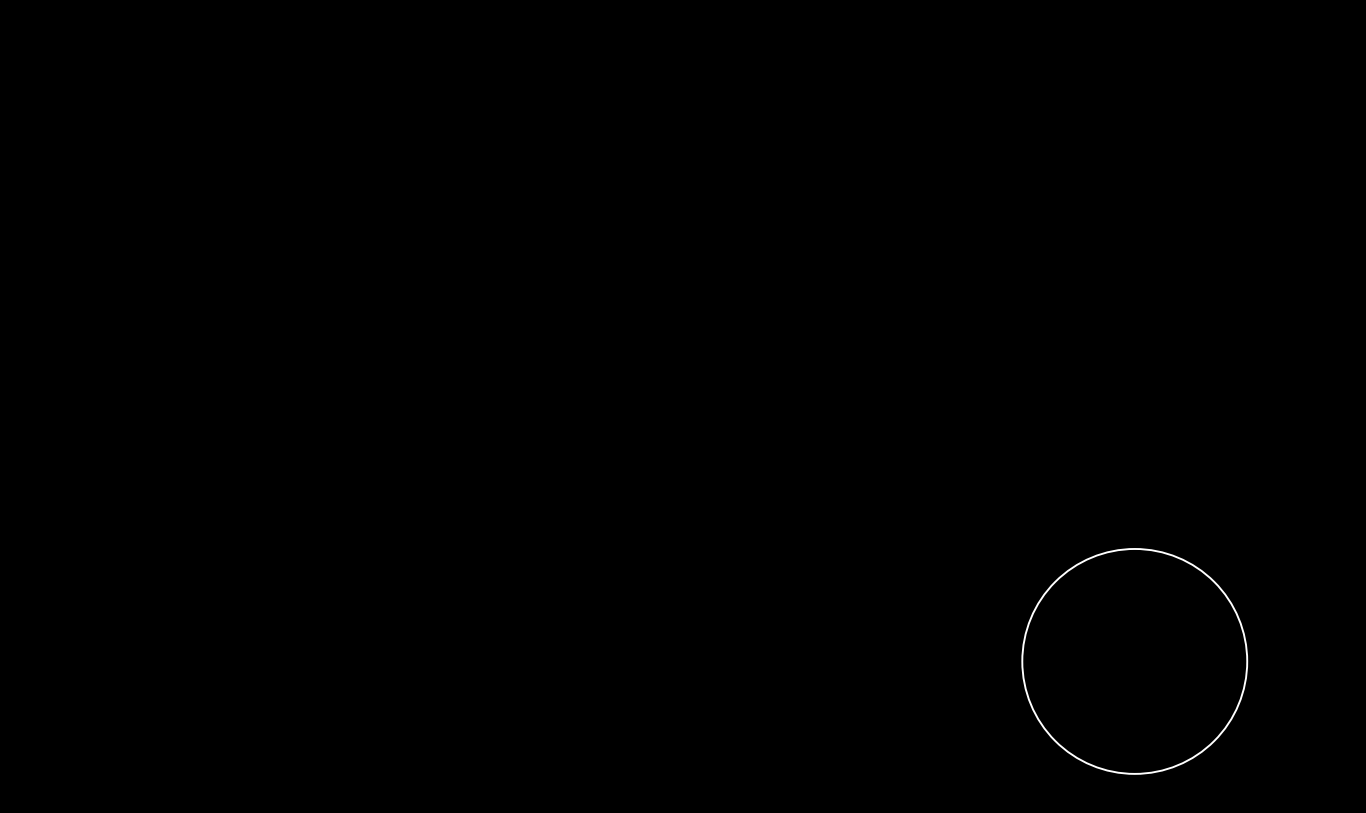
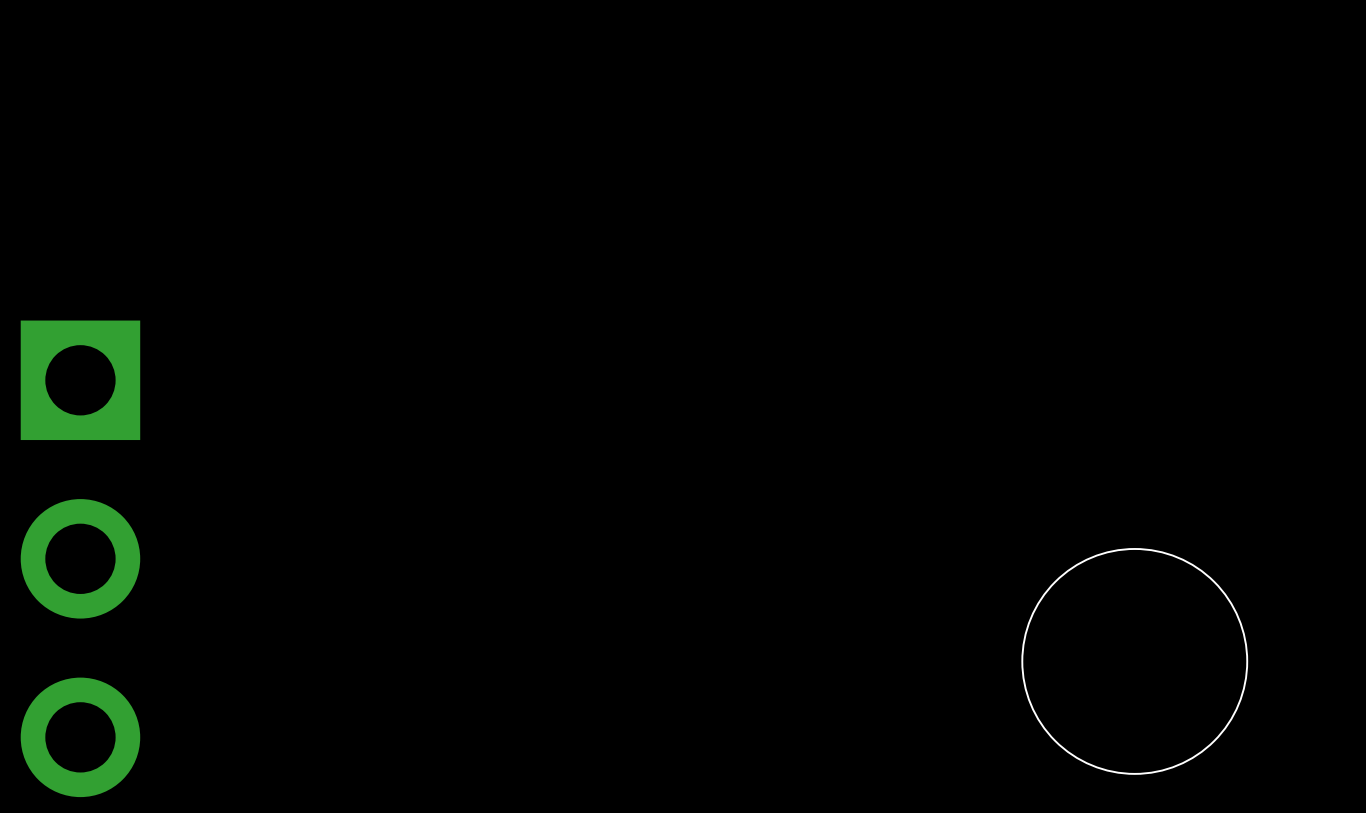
part: none -> (80, 558)

